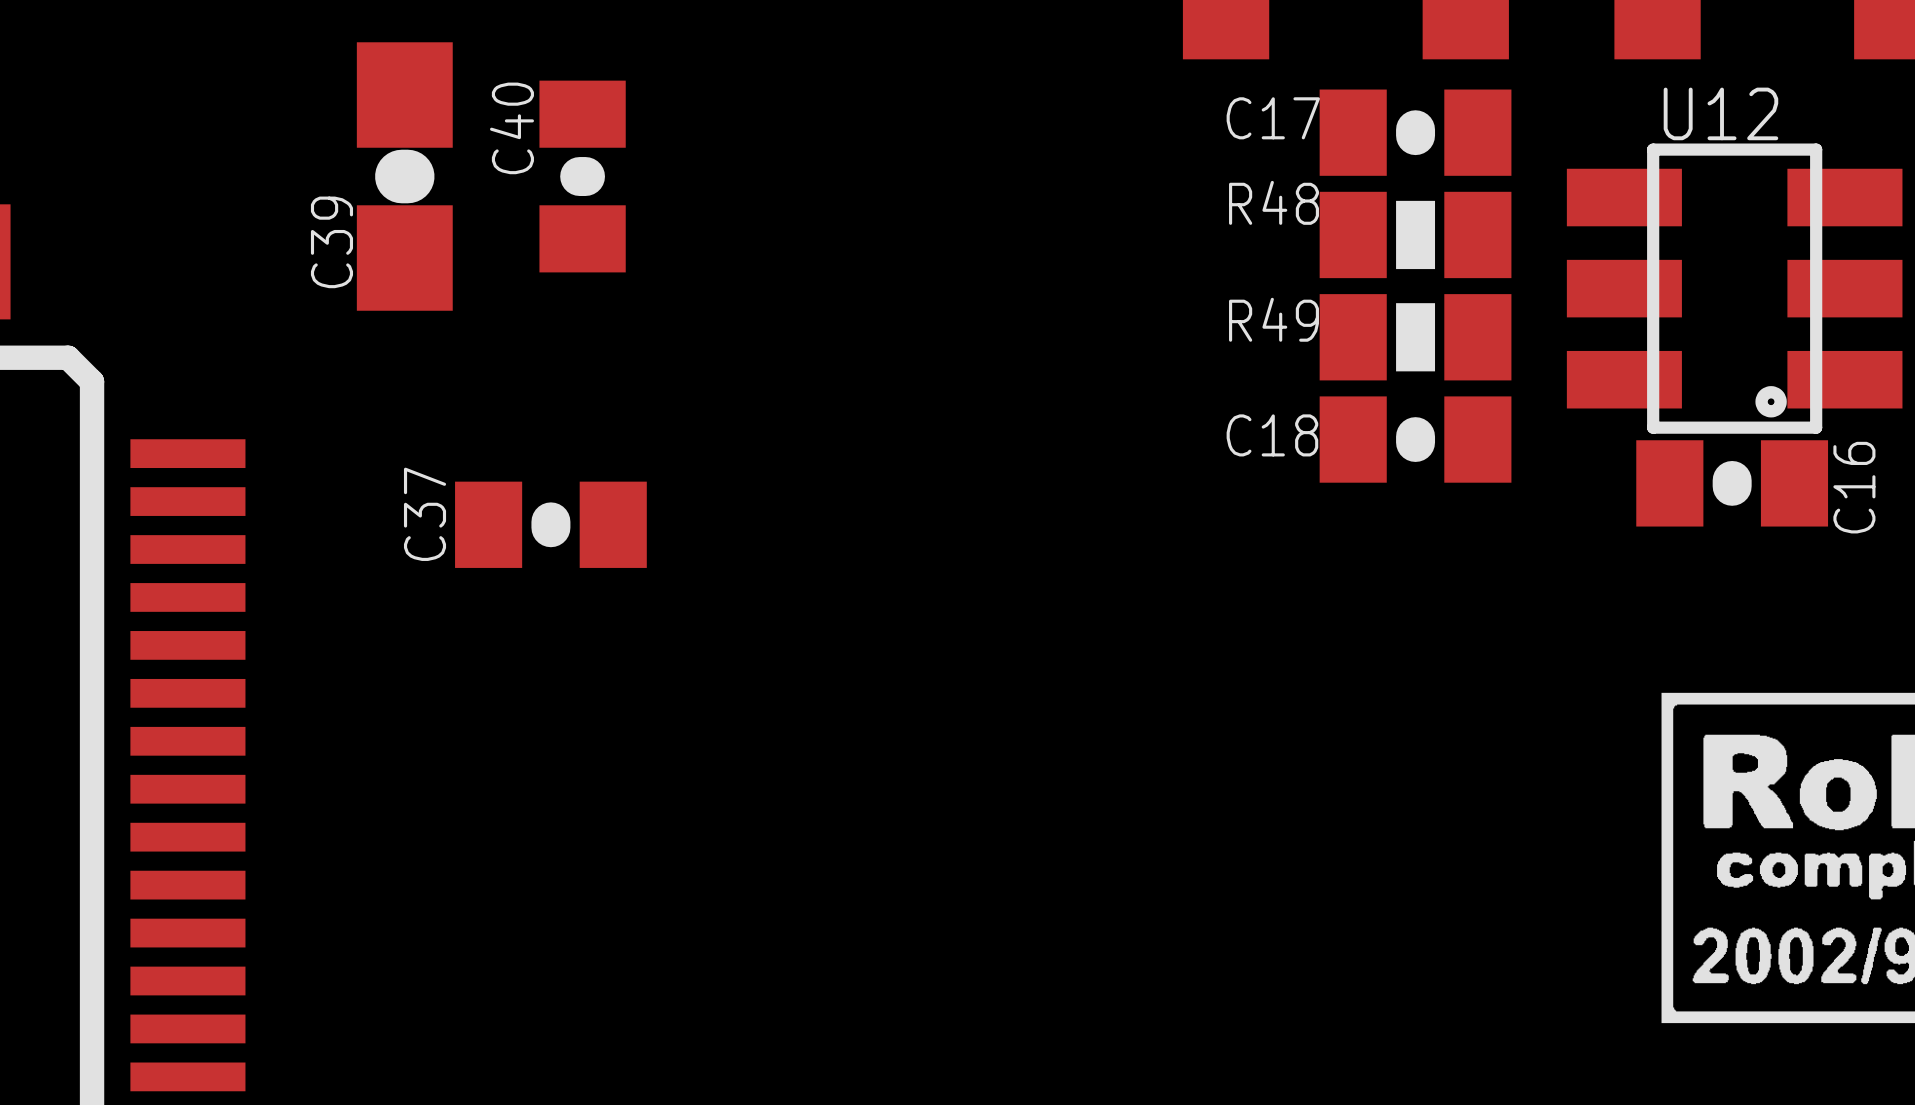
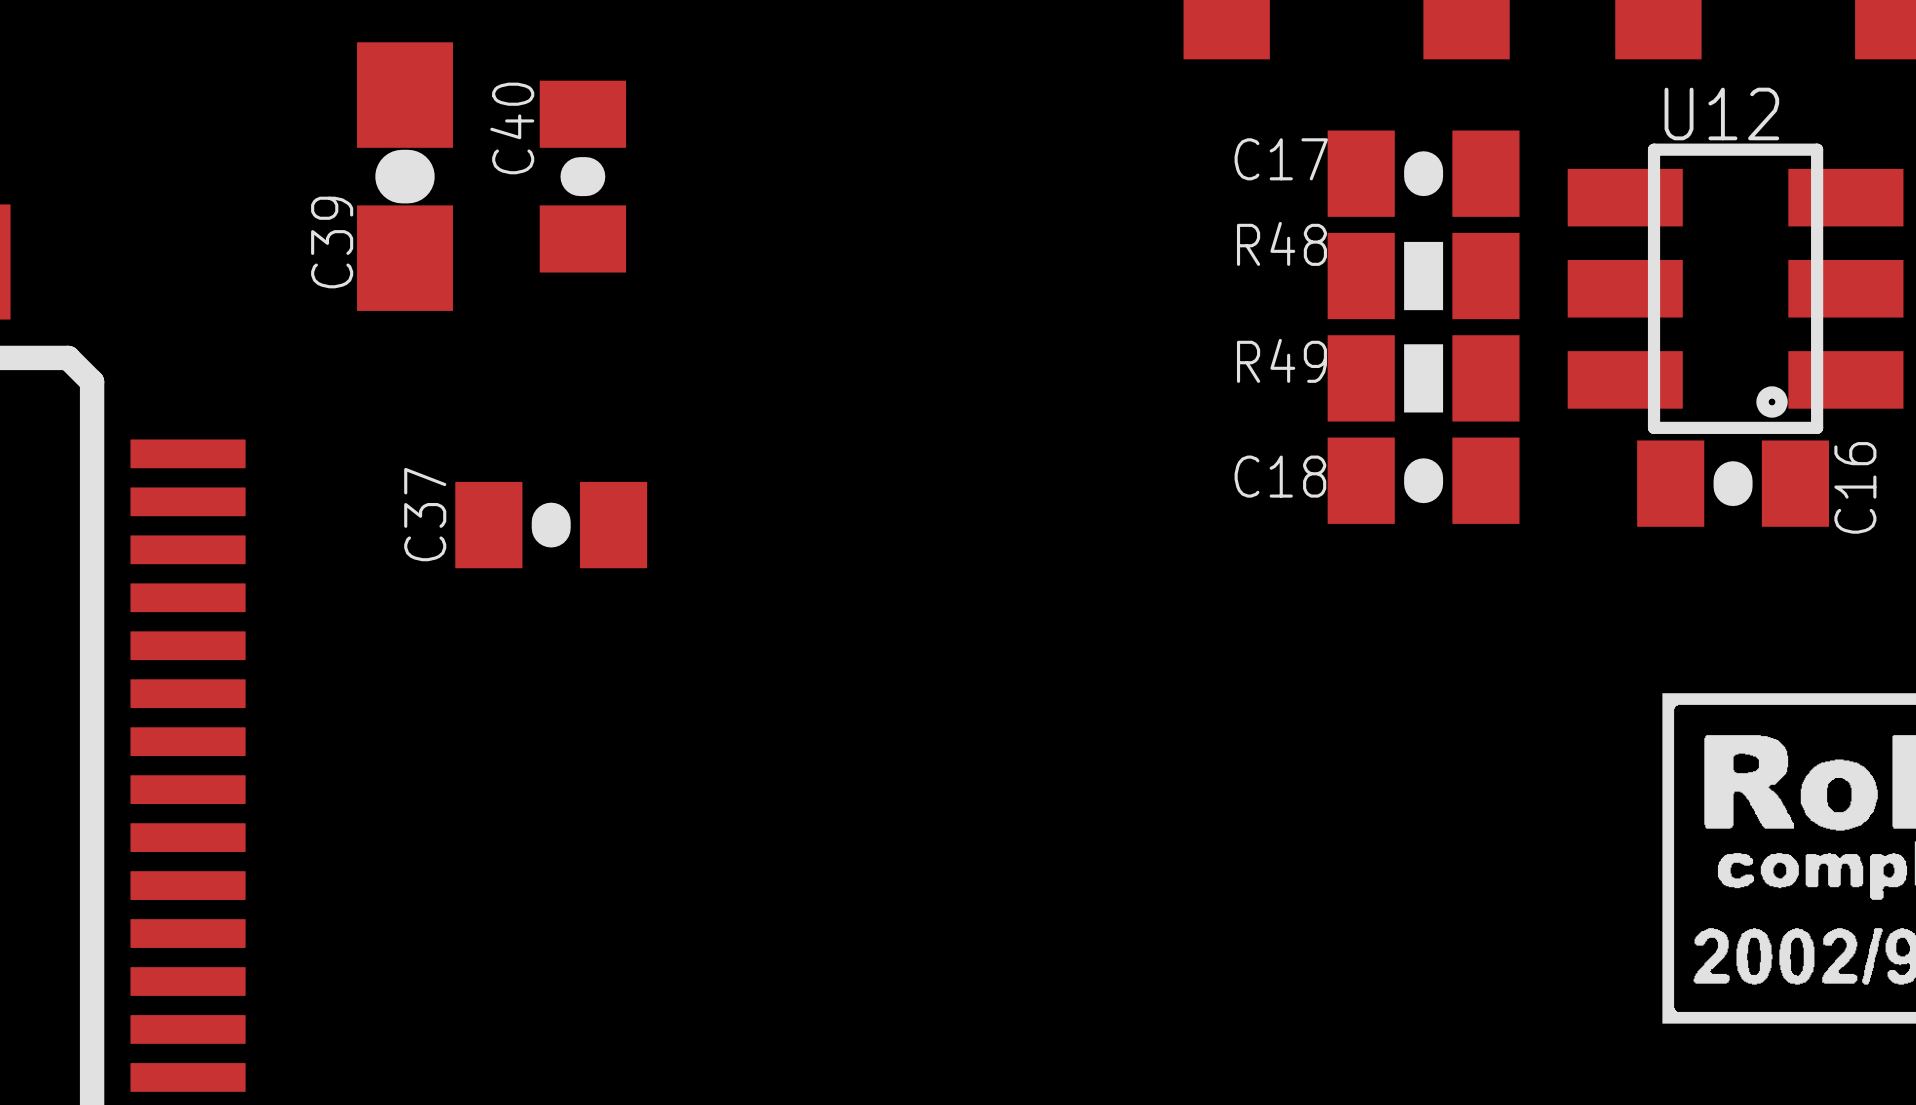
C17 position: (1415, 132) -> (1423, 173)
R48 position: (1415, 234) -> (1423, 276)
R49 position: (1415, 337) -> (1423, 378)
C18 position: (1415, 439) -> (1423, 480)

